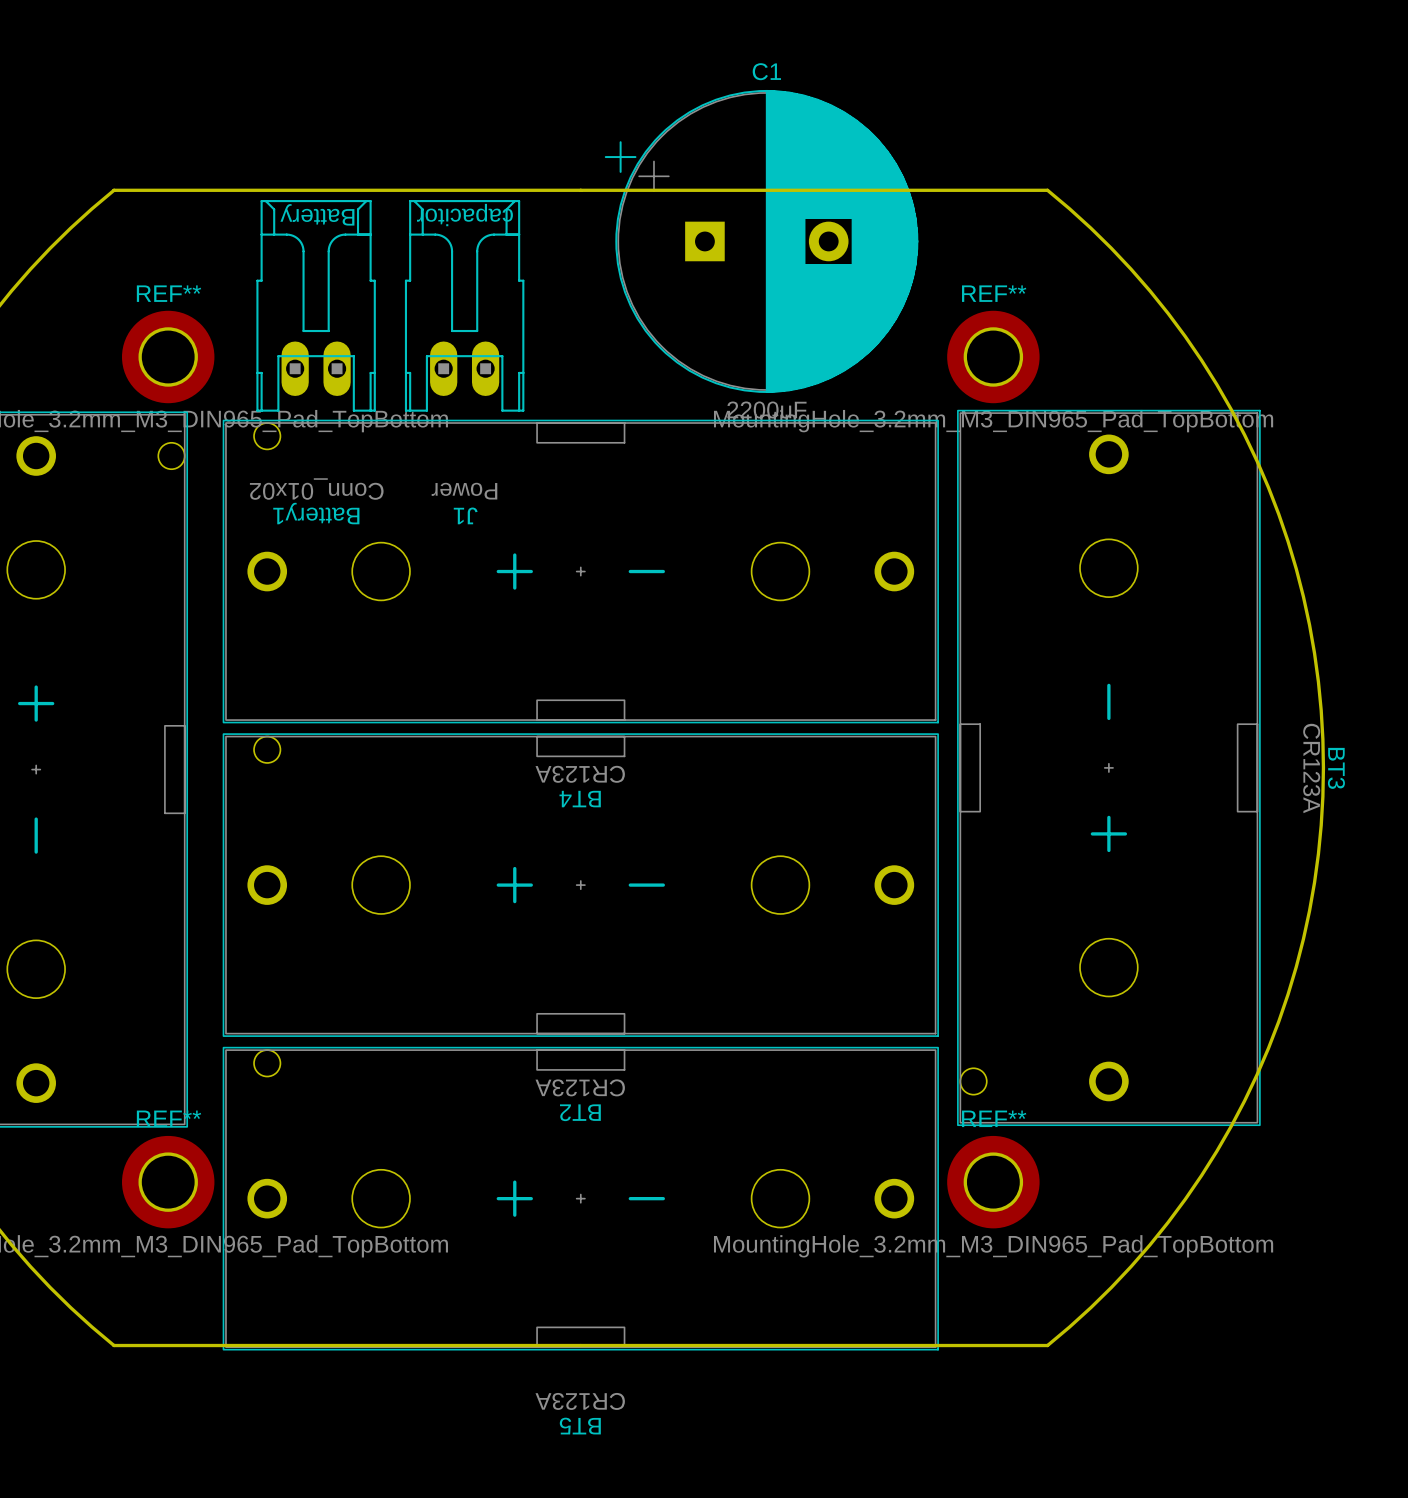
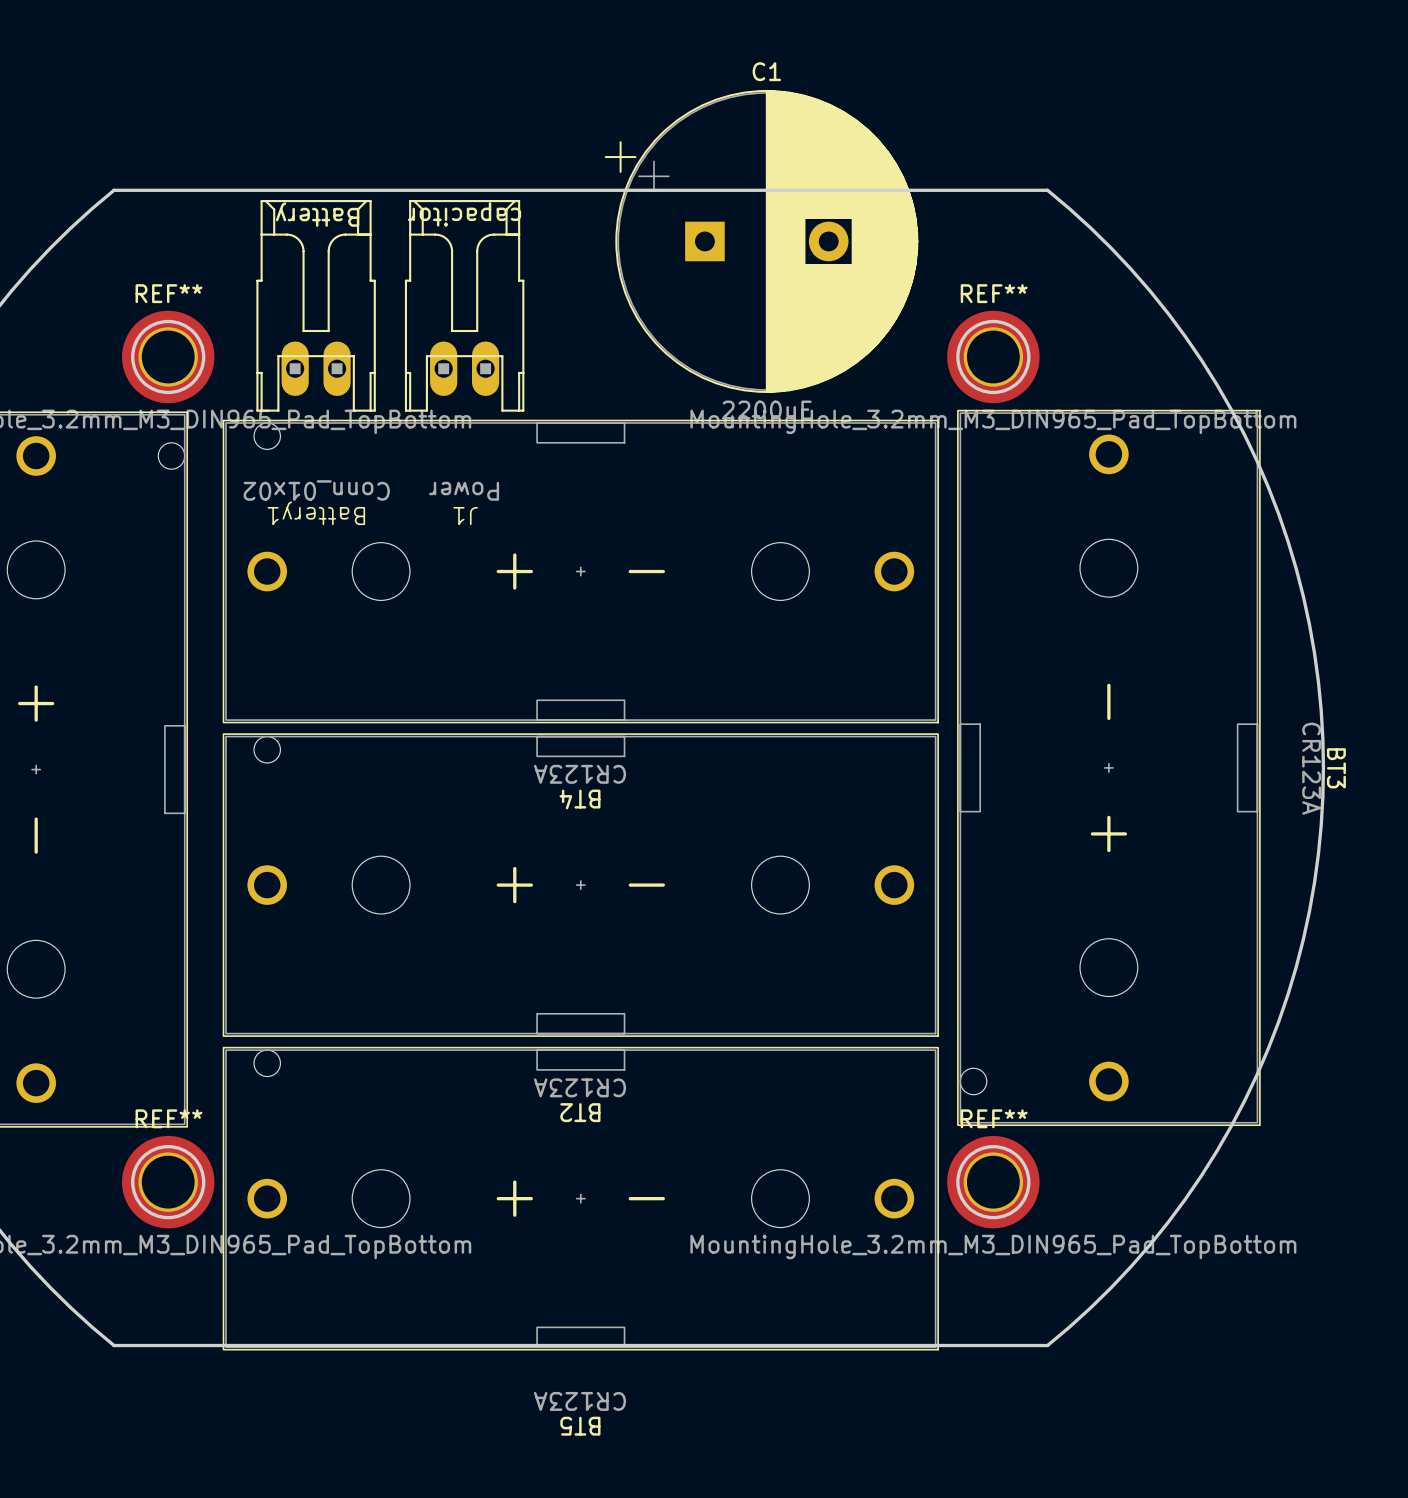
round board edge: none -> [131, 319, 206, 395]
round board edge: none -> [956, 319, 1031, 395]
round board edge: none -> [131, 1145, 206, 1220]
round board edge: none -> [956, 1145, 1031, 1220]

